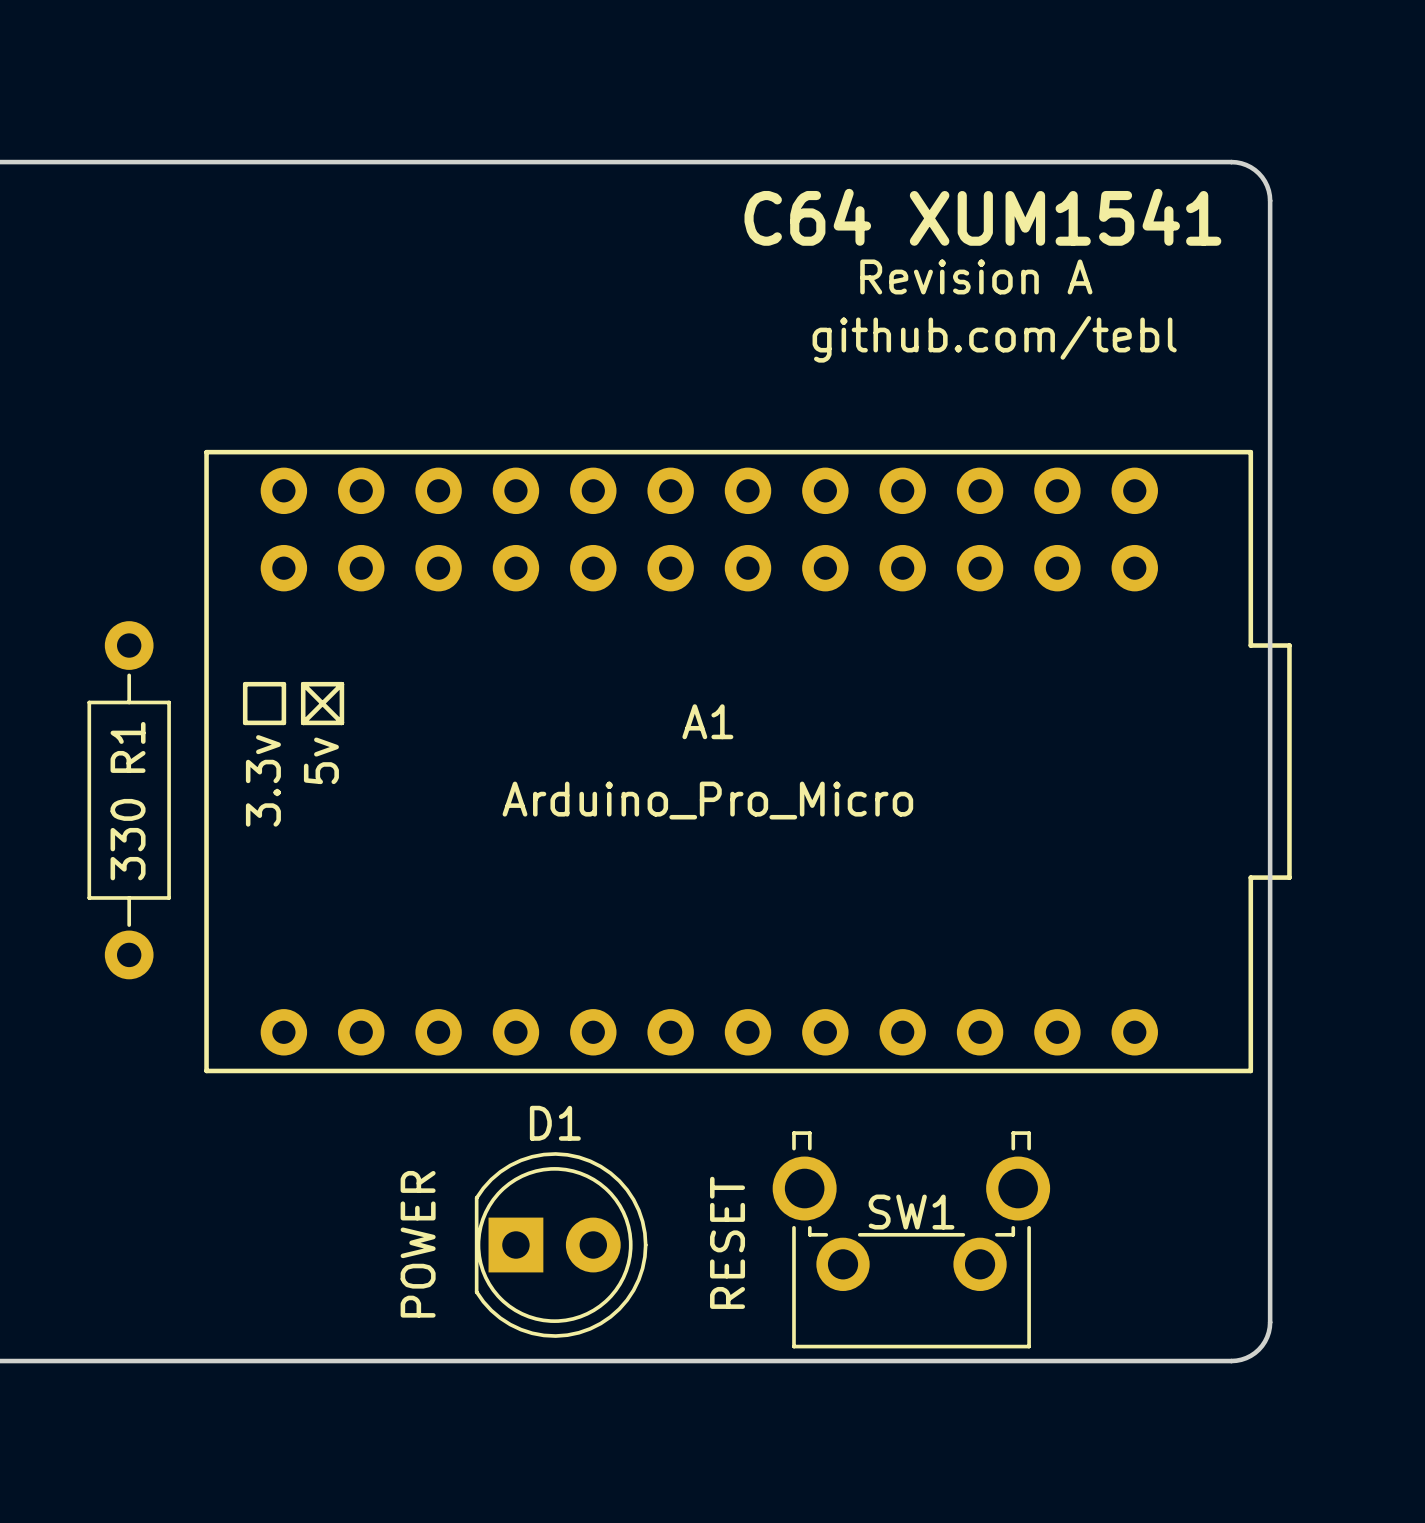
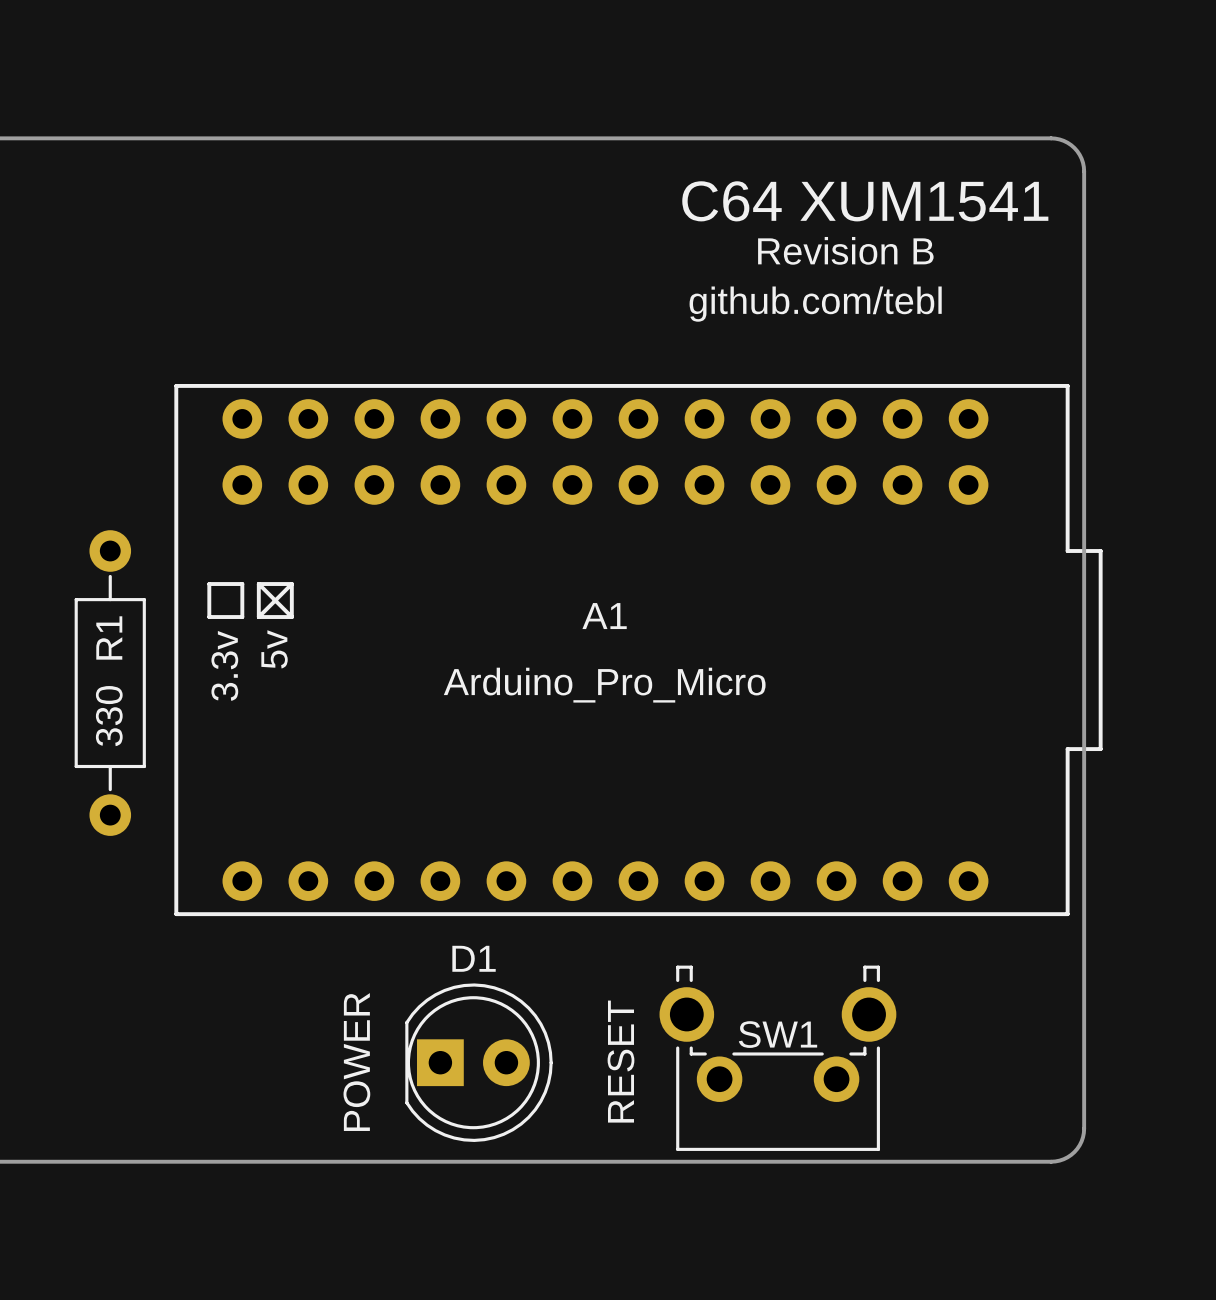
text position: C64 XUM1541 (982, 217) -> C64 XUM1541 (865, 201)
text: Revision A (976, 276) -> Revision B (845, 250)
text position: github.com/tebl (994, 339) -> github.com/tebl (815, 304)

